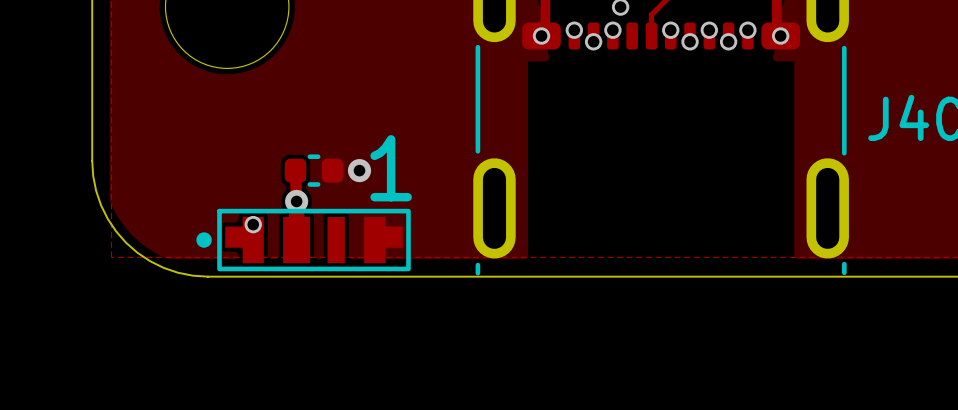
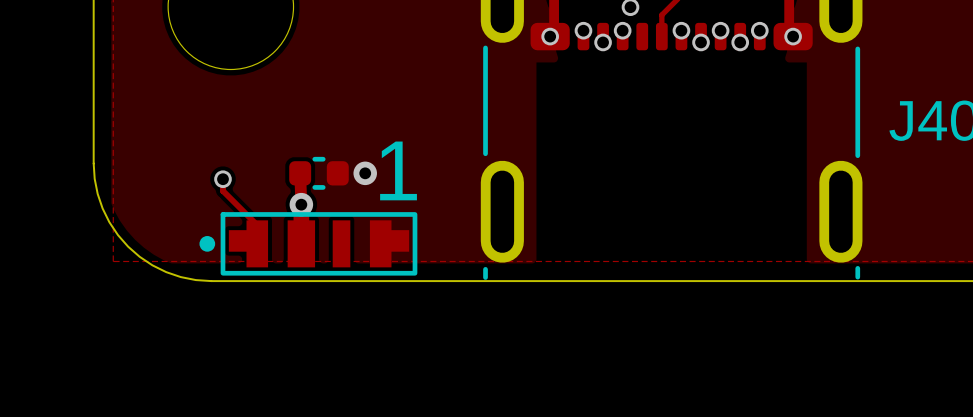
track: none -> (222, 179) (222, 190) (258, 226)
via position: (253, 224) -> (222, 179)

